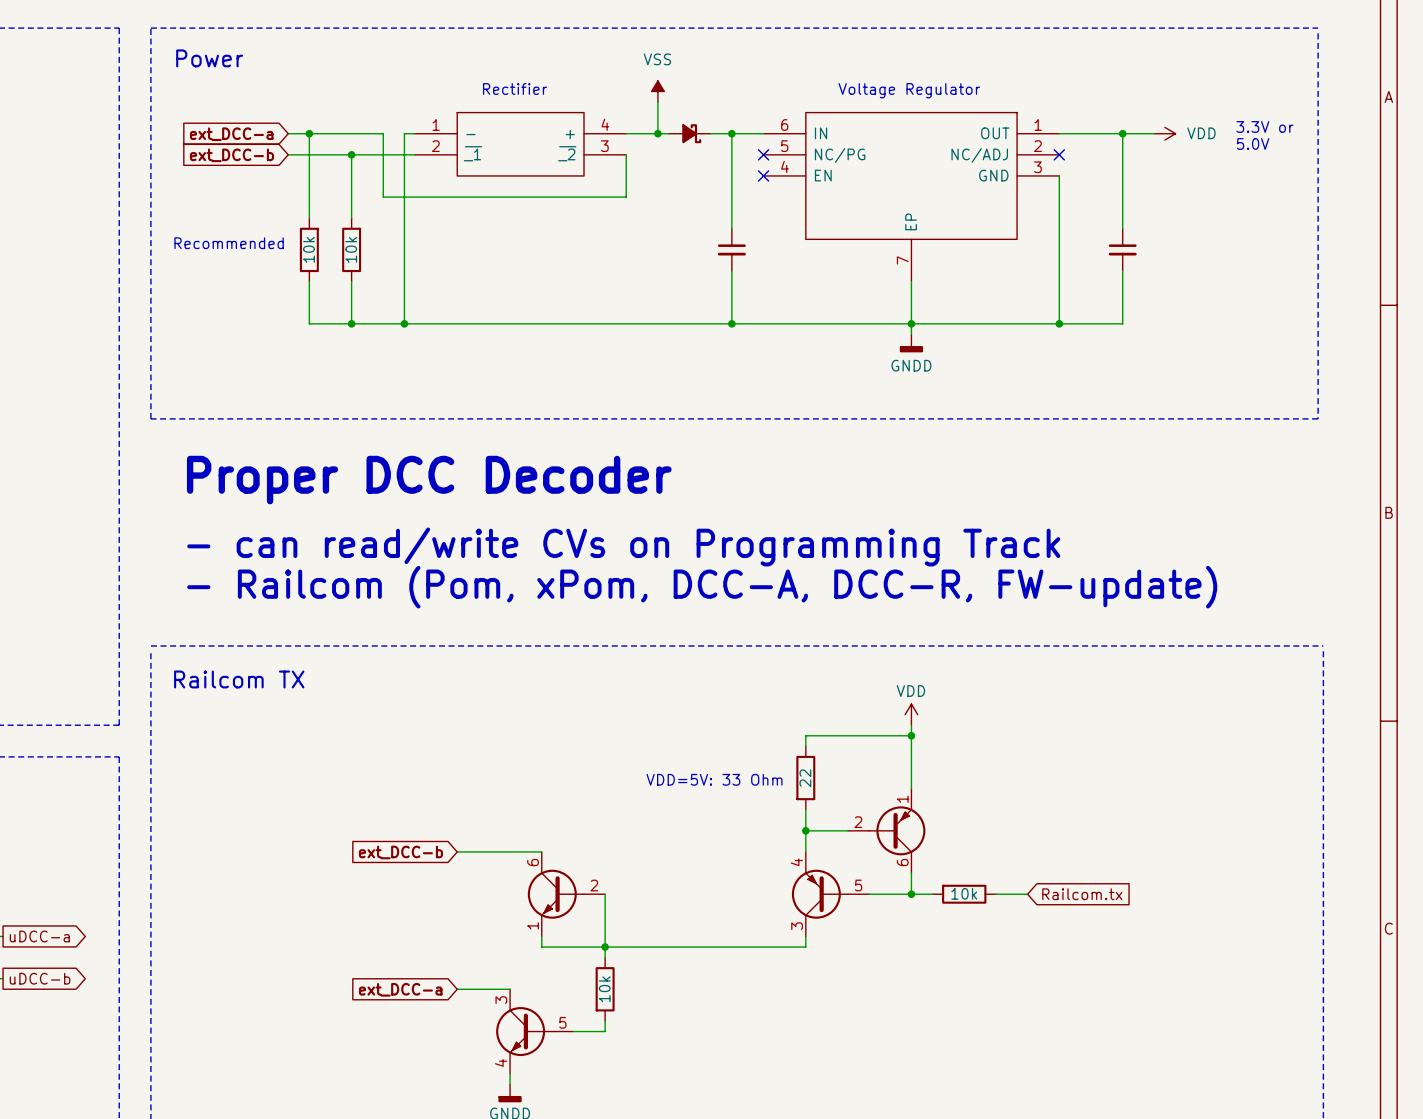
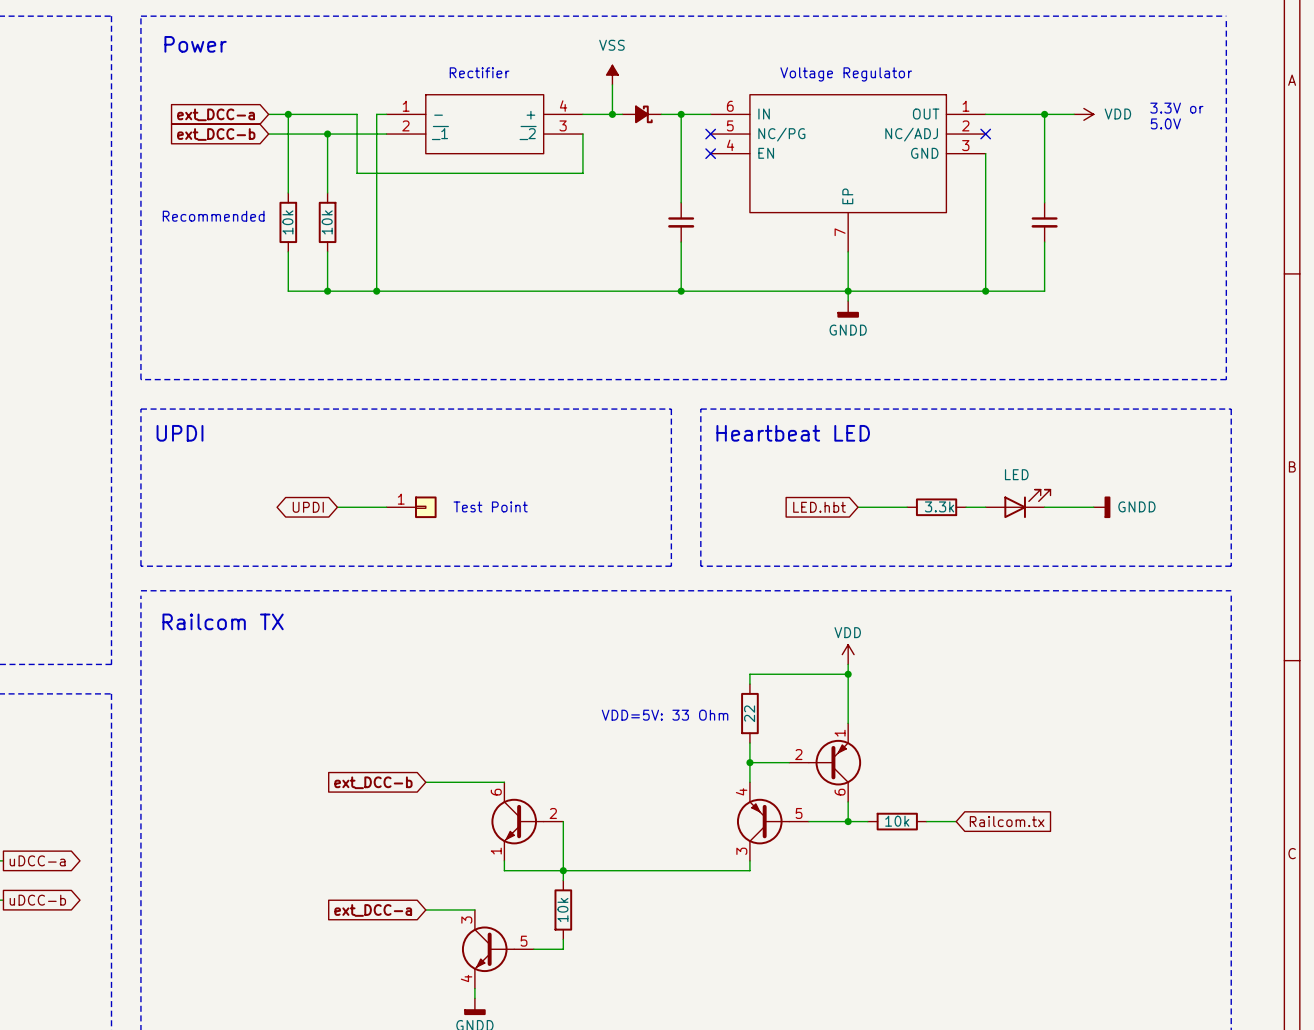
line: none -> (140, 409) (671, 409) (671, 566) (140, 566) (140, 409)
line: none -> (700, 409) (700, 566) (1231, 566) (1231, 409) (700, 409)
text: none -> UPDI (180, 433)
text: none -> Heartbeat LED (793, 433)
text: Proper DCC Decoder (429, 480) -> none
text: - can read/write CVs on Programming Track (623, 546) -> none
part: none -> LED (1018, 503)
text: none -> Test Point (490, 506)
global label: none -> UPDI (308, 507)
part: none -> (411, 507)
global label: none -> LED.hbt (819, 507)
wire: none -> (857, 507) (907, 507)
part: none -> 3.3k (936, 507)
wire: none -> (966, 507) (985, 507)
wire: none -> (1044, 507) (1093, 507)
power symbol: none -> GNDD (1102, 507)
text: - Railcom (Pom, xPom, DCC-A, DCC-R, FW-update) (702, 587) -> none

